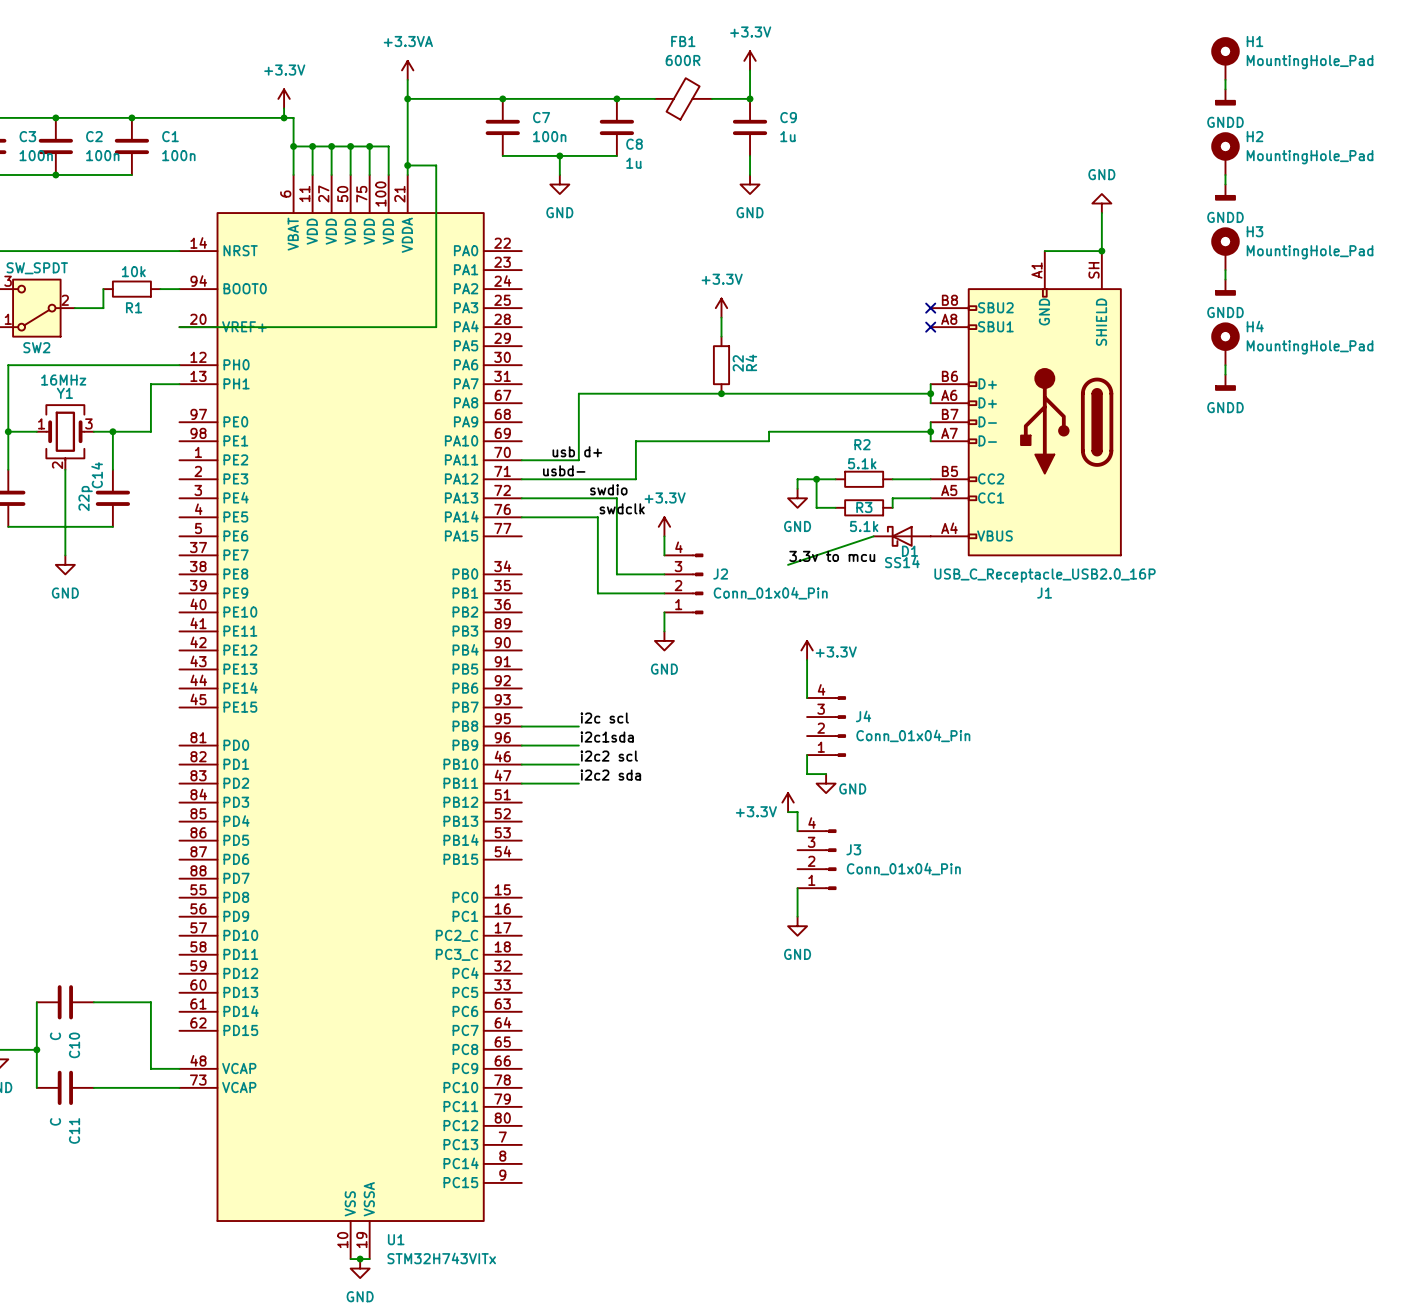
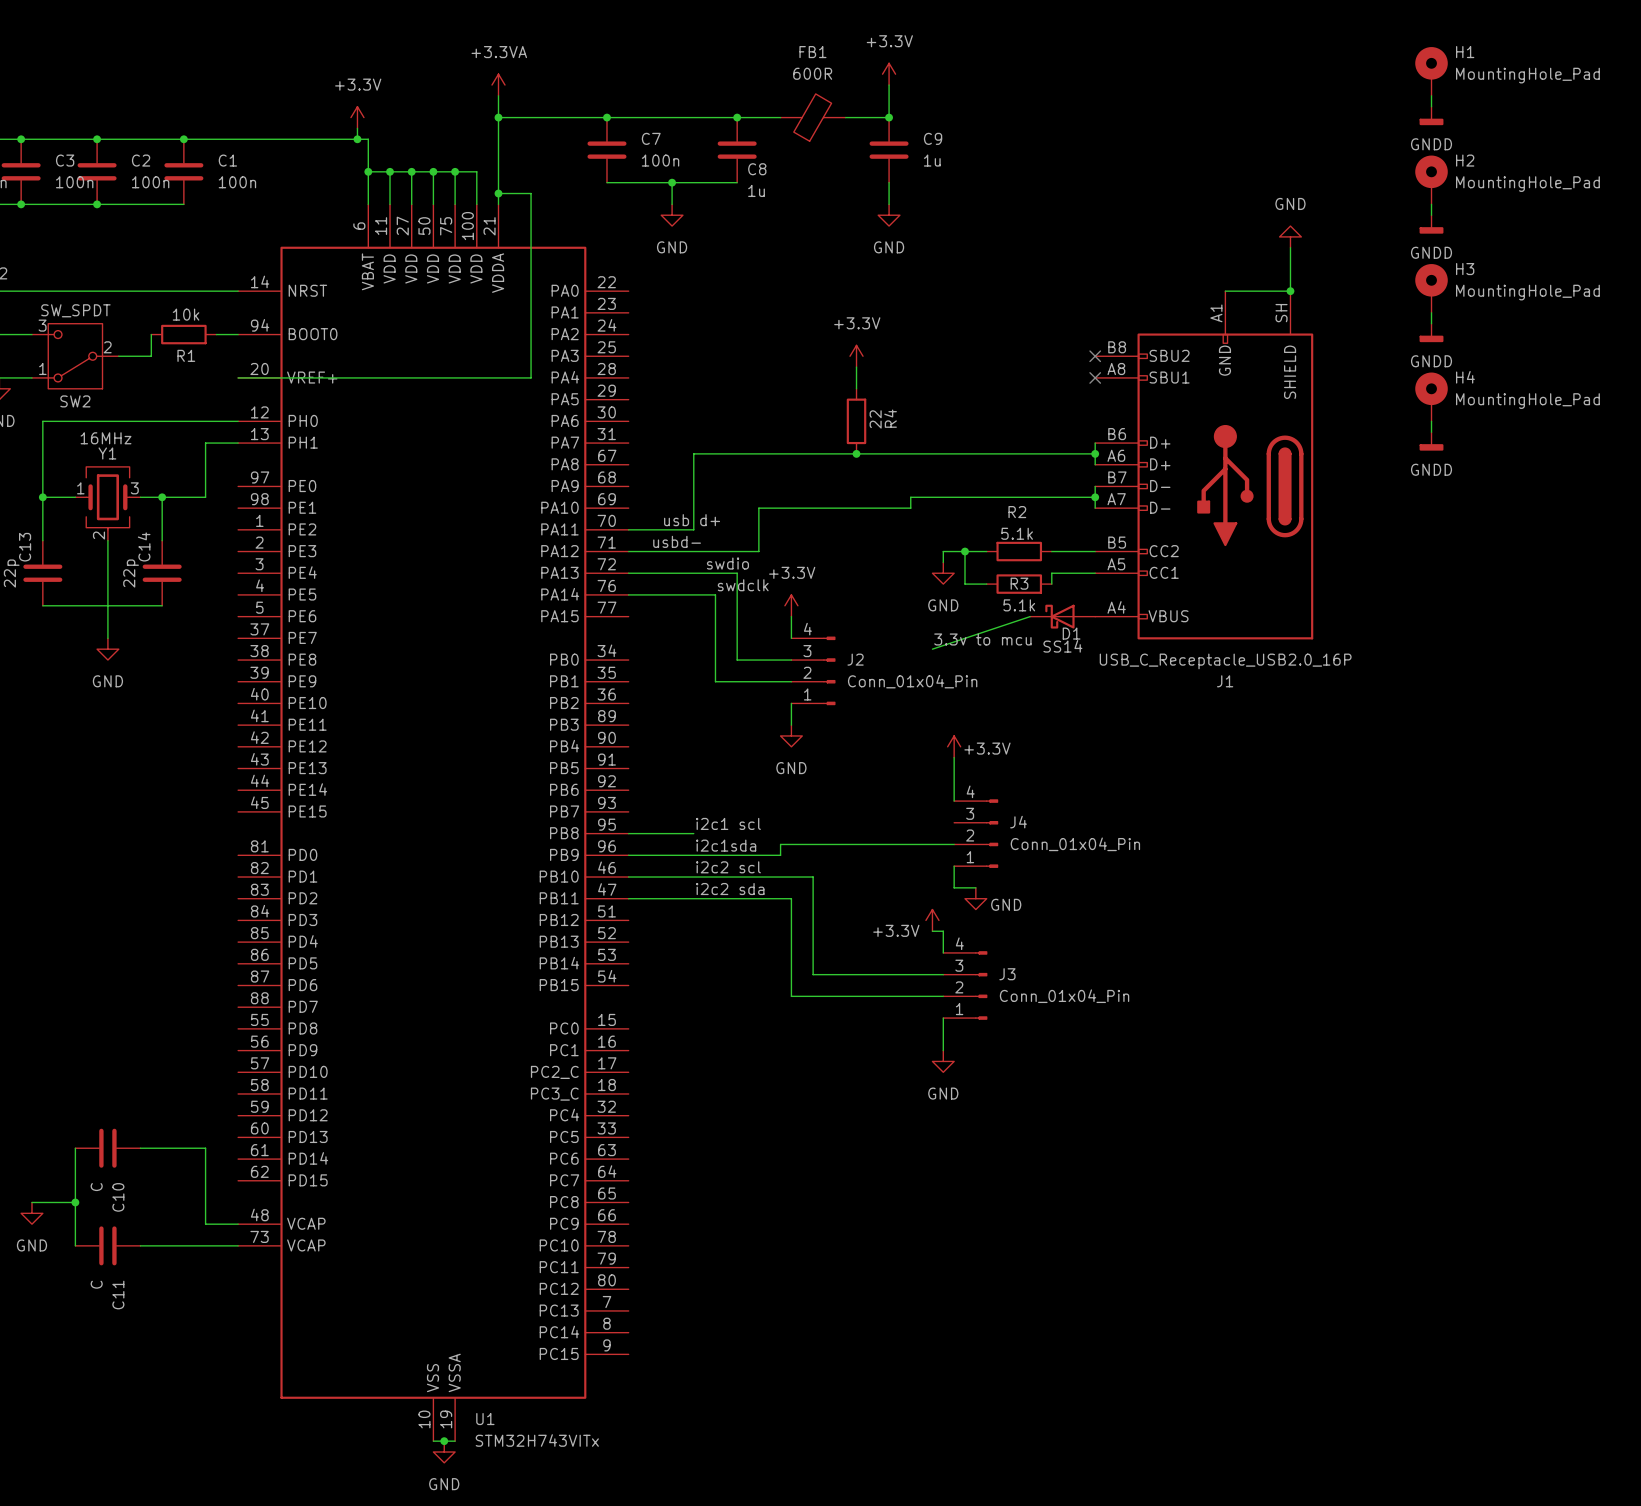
label: i2c scl (604, 718) -> i2c1 scl (728, 823)
wire: none -> (954, 844) (780, 844) (780, 855) (693, 855)
wire: none -> (693, 877) (813, 877) (813, 974) (943, 974)
wire: none -> (693, 898) (791, 898) (791, 996) (943, 996)

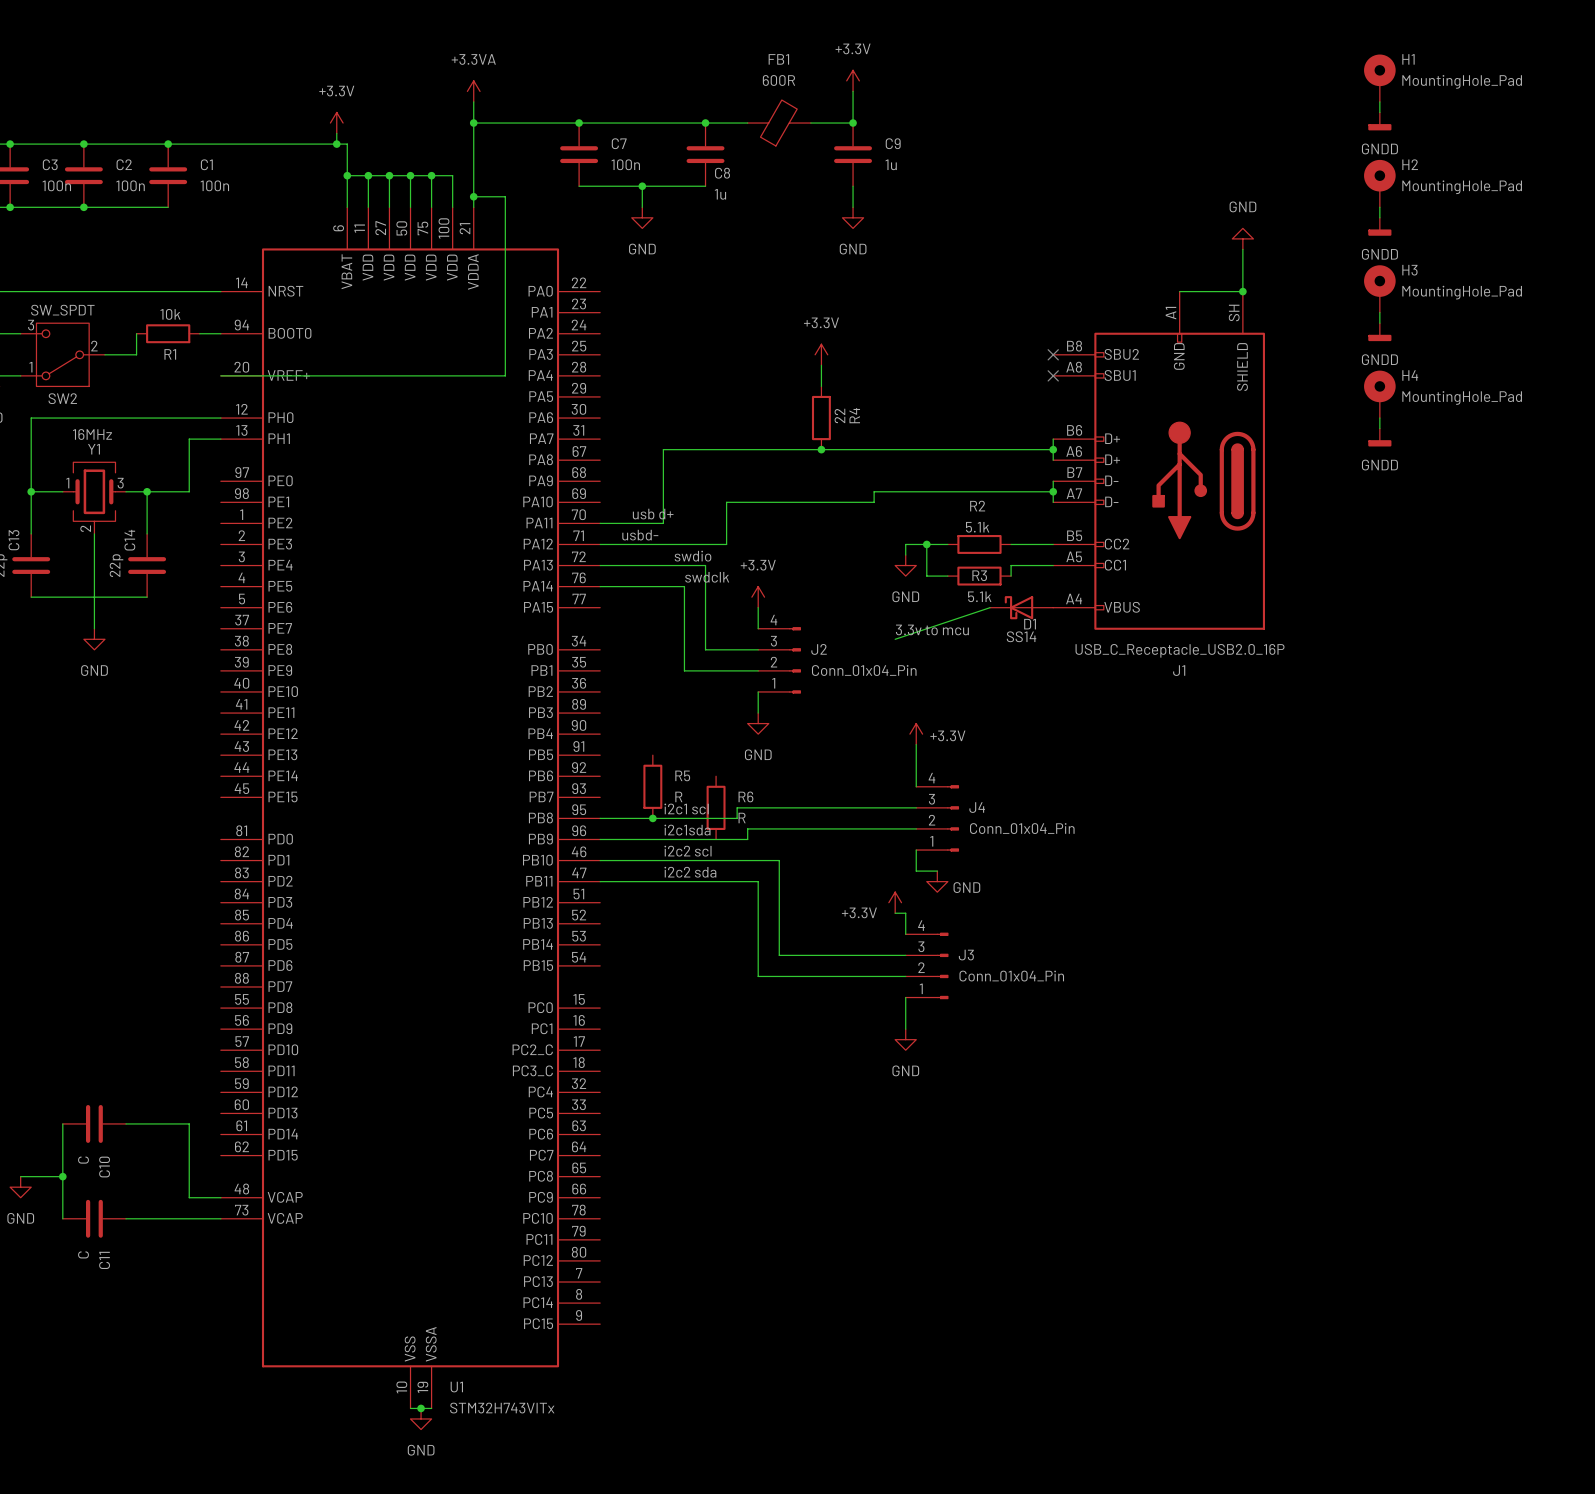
R5: none -> R (652, 786)
R6: none -> R (716, 807)
wire: none -> (916, 807) (737, 807) (737, 818) (663, 818)
junction: none -> (652, 818)

